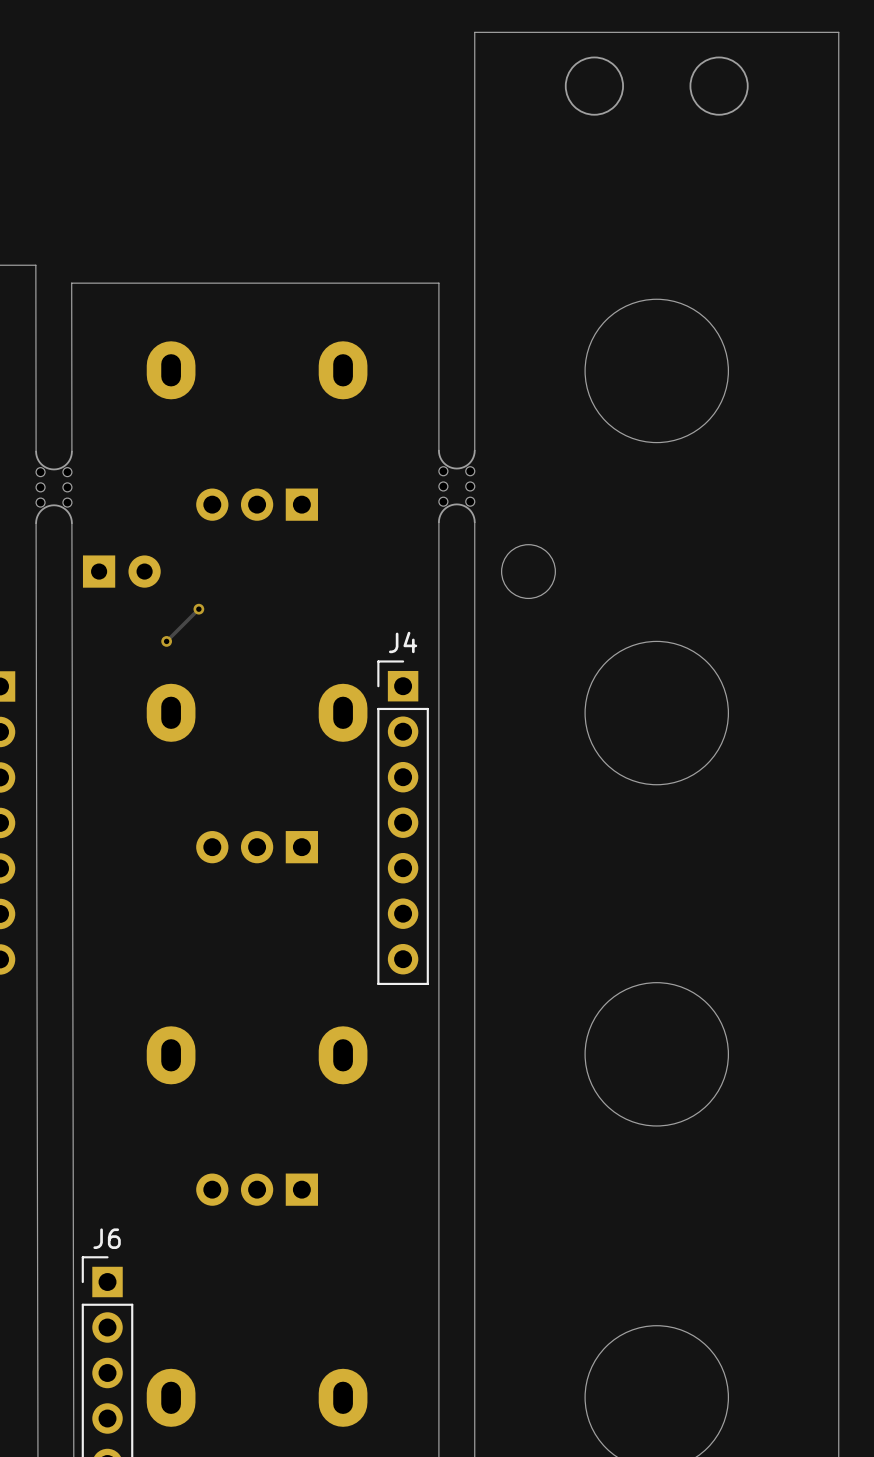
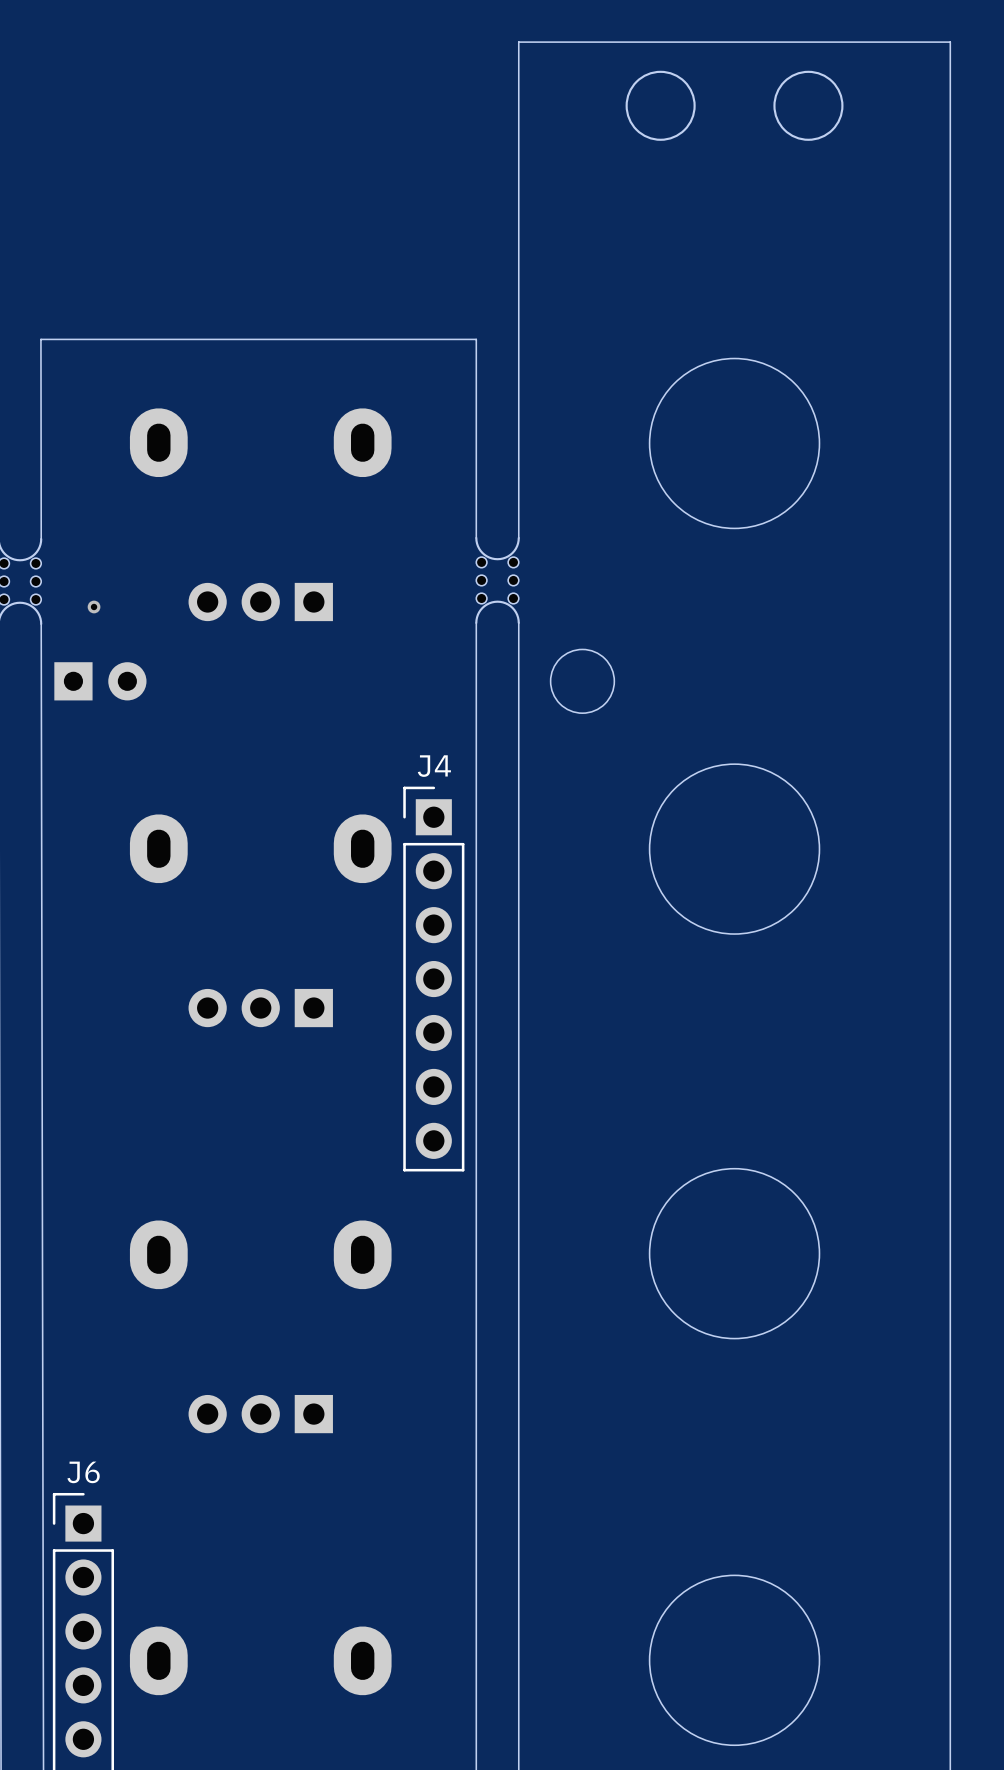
via: none -> (94, 606)
track: (198, 609) (166, 641) -> none
via: (198, 609) -> none
via: (166, 641) -> none

